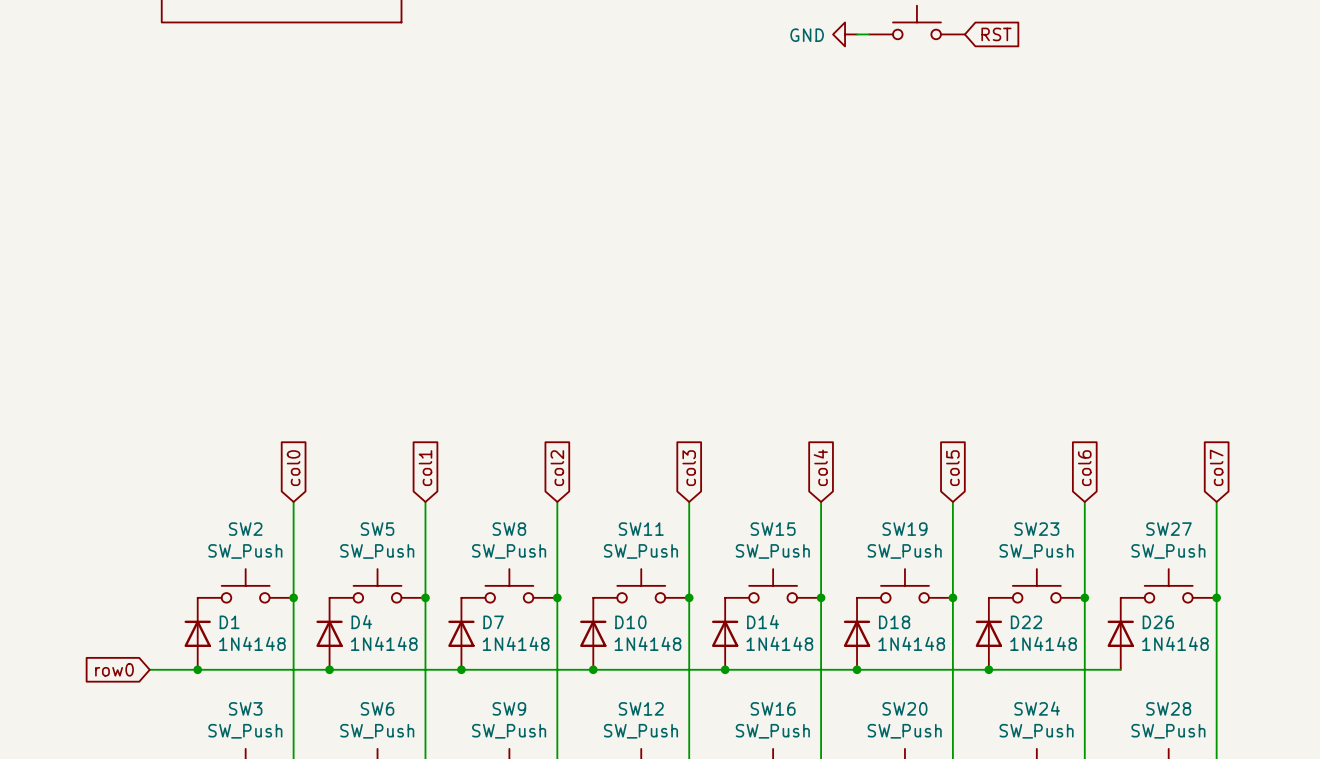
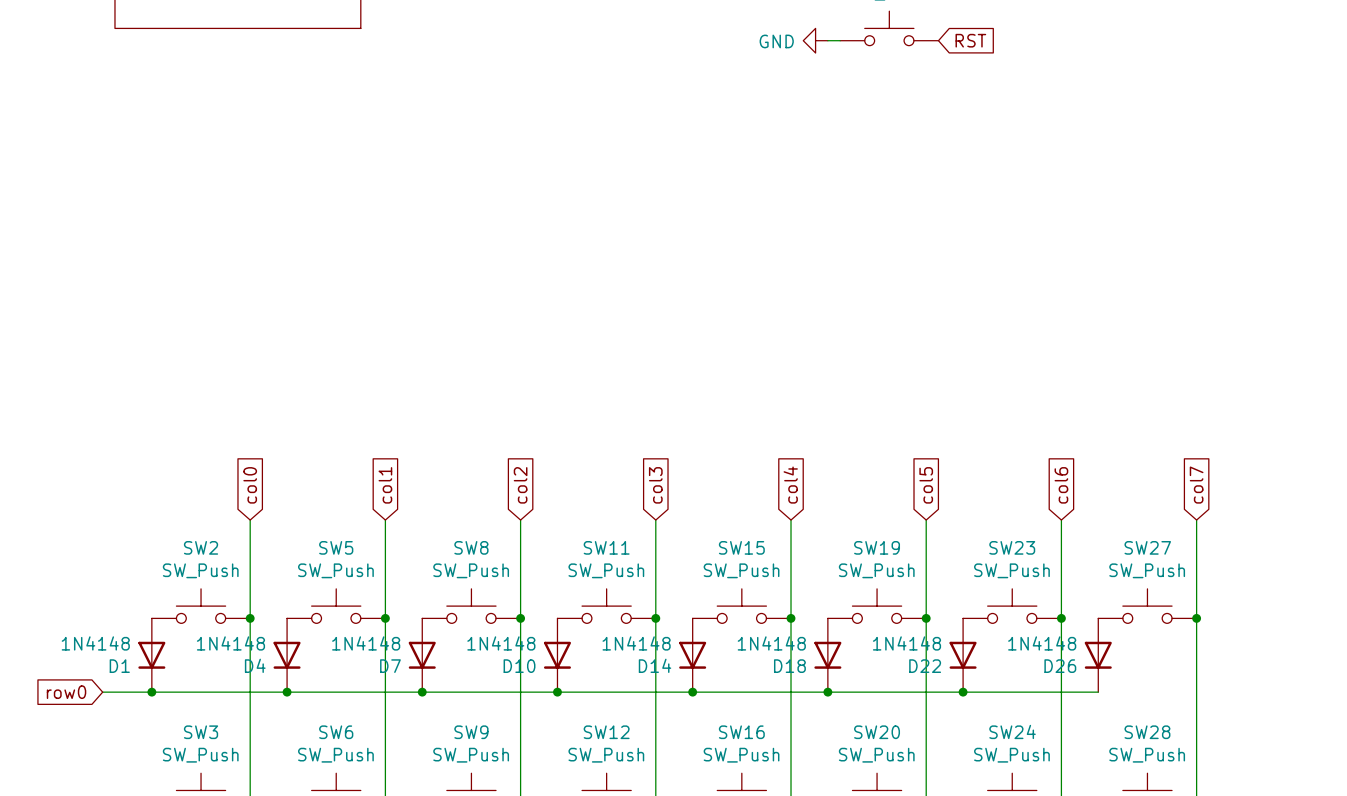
D1 rotation: 0° (197, 633) -> 180° (151, 655)
D4 rotation: 0° (329, 633) -> 180° (287, 655)
D7 rotation: 0° (461, 633) -> 180° (422, 655)
D10 rotation: 0° (593, 633) -> 180° (557, 655)
D14 rotation: 0° (725, 633) -> 180° (692, 655)
D18 rotation: 0° (857, 633) -> 180° (827, 655)
D22 rotation: 0° (988, 633) -> 180° (963, 655)
D26 rotation: 0° (1120, 633) -> 180° (1098, 655)

